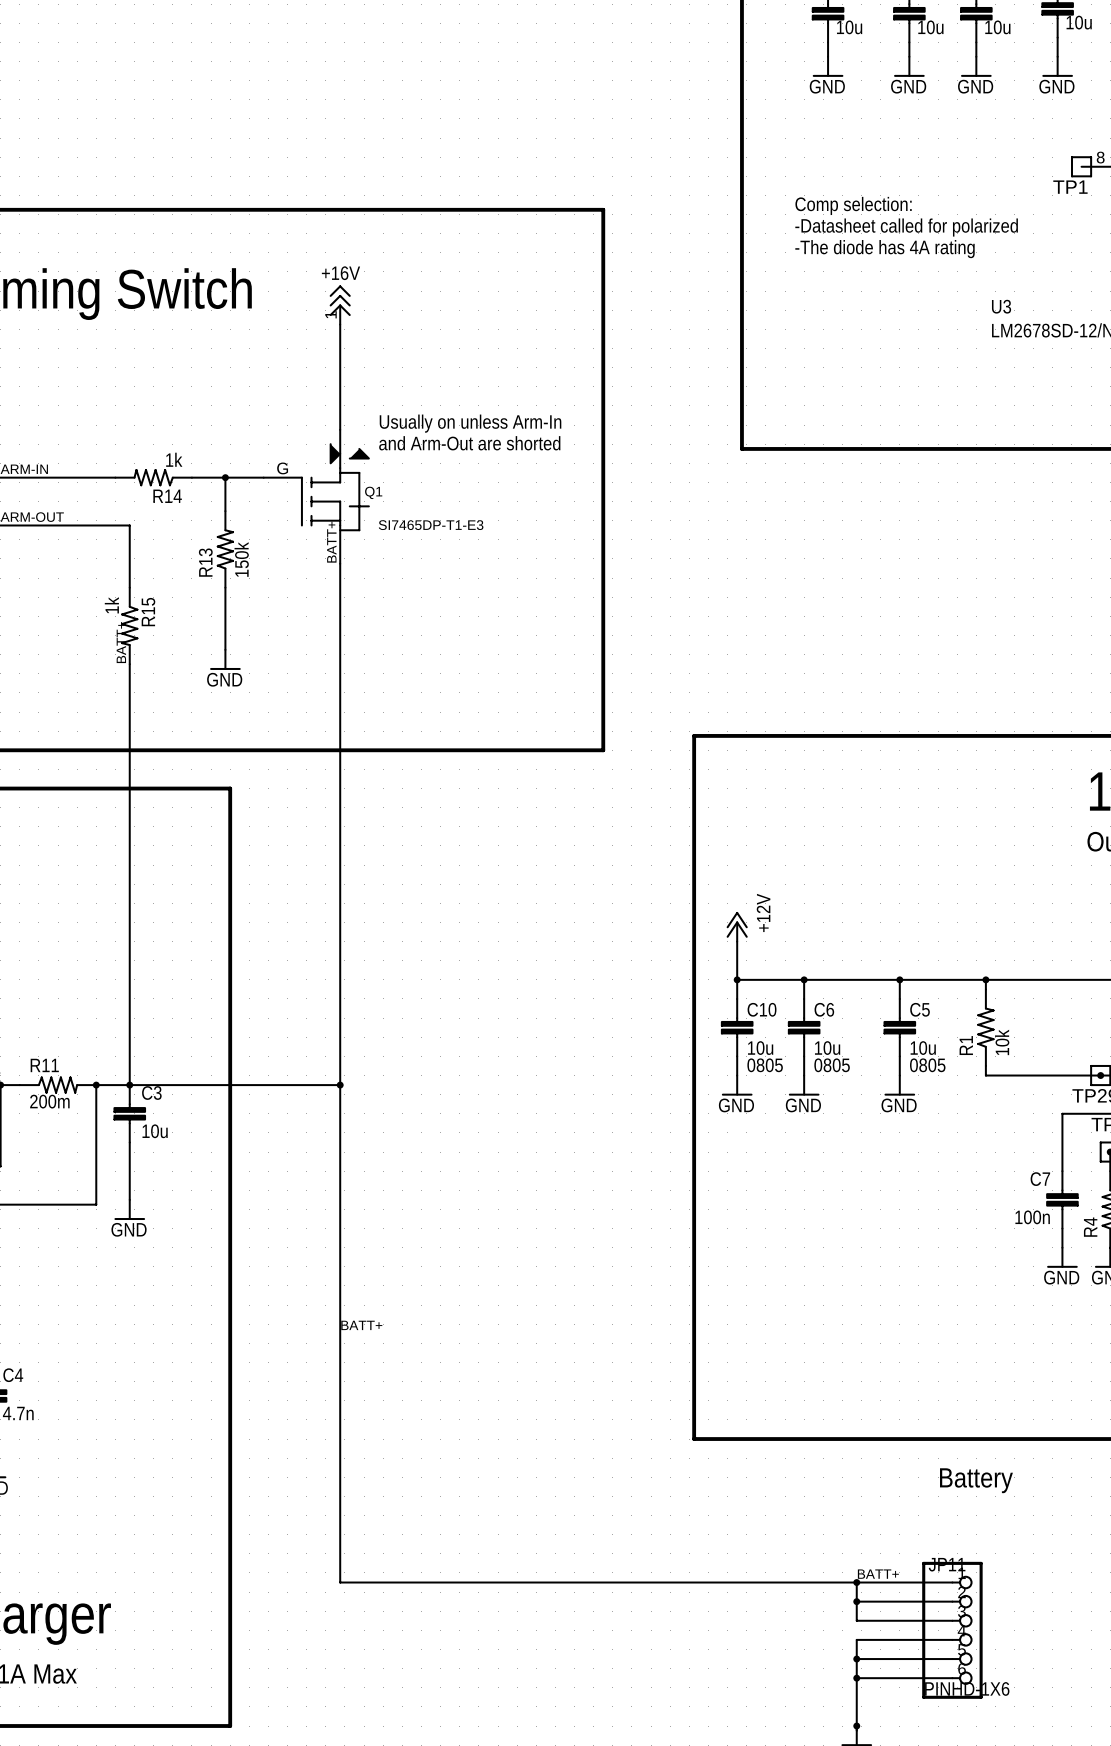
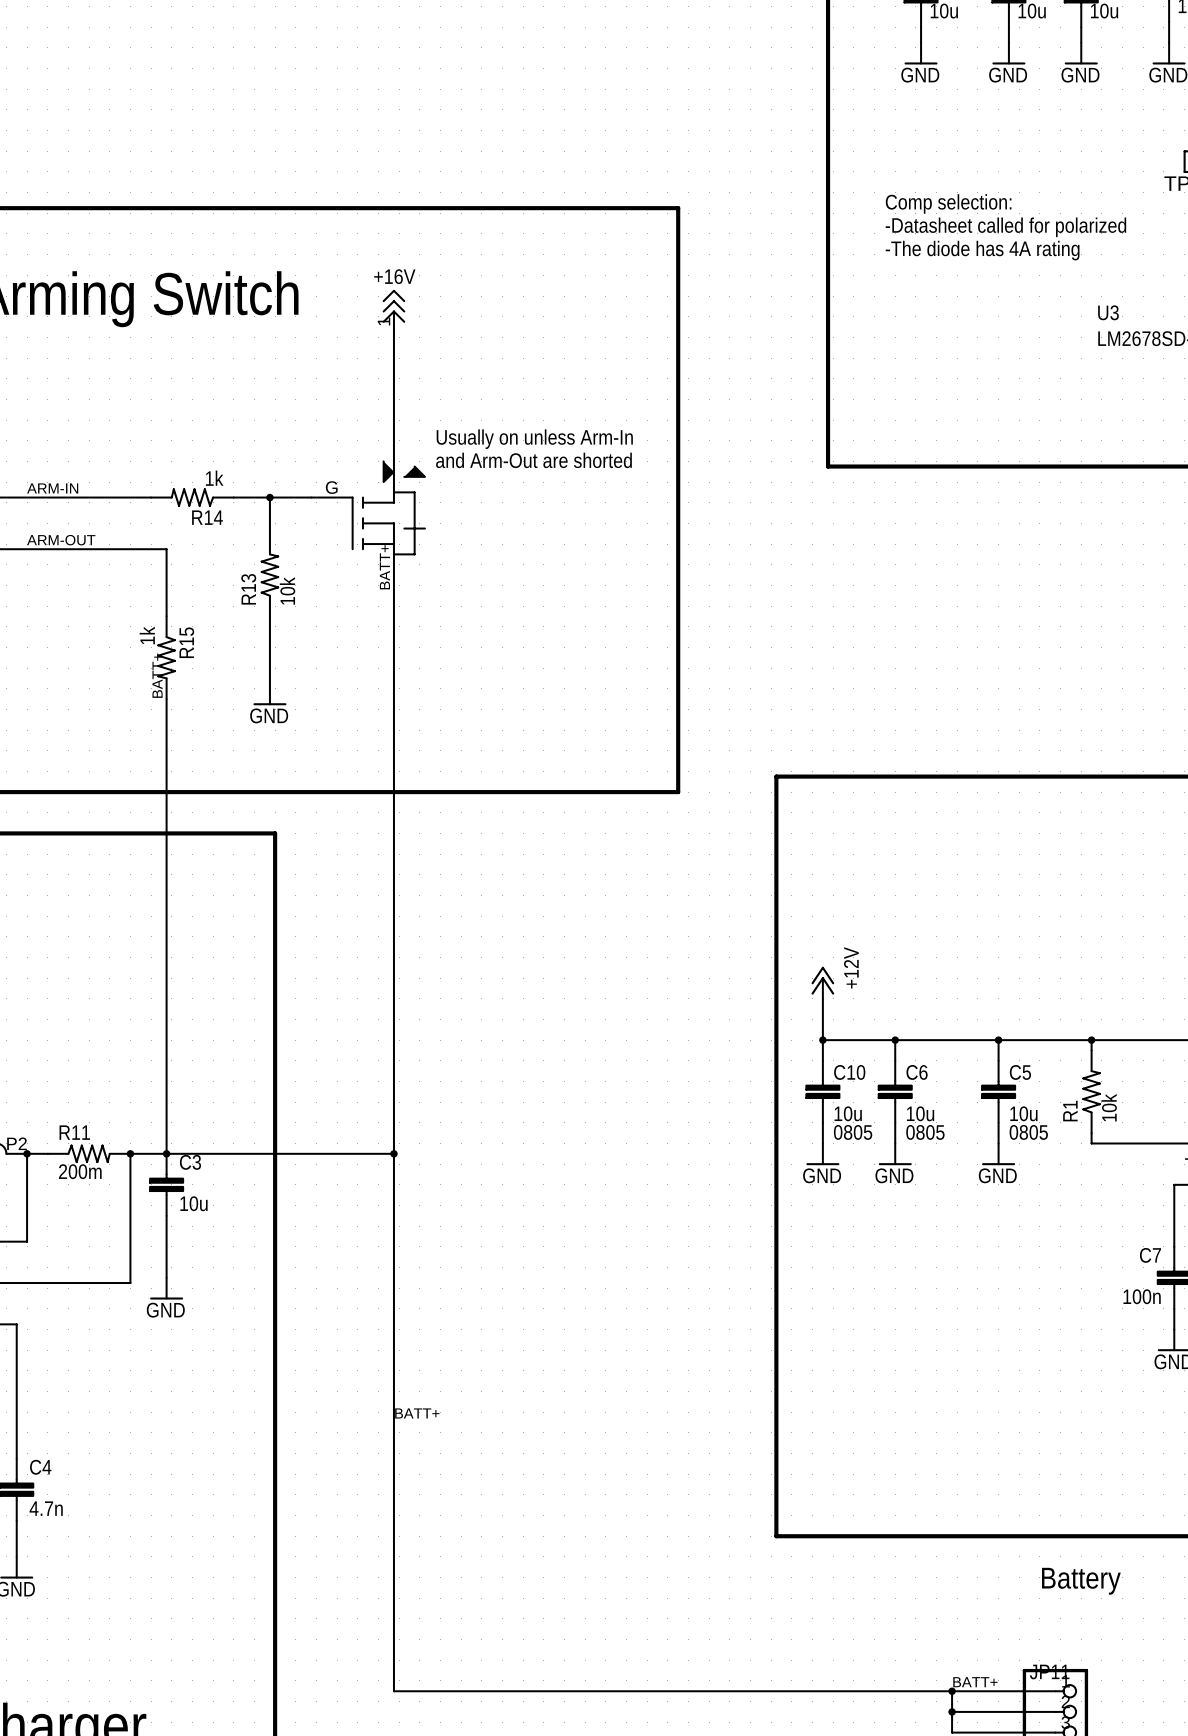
Q1 name: Q1 (373, 492) -> none
Q1 value: SI7465DP-T1-E3 (431, 525) -> none
R13 value: 150k (241, 559) -> 10k (287, 590)

